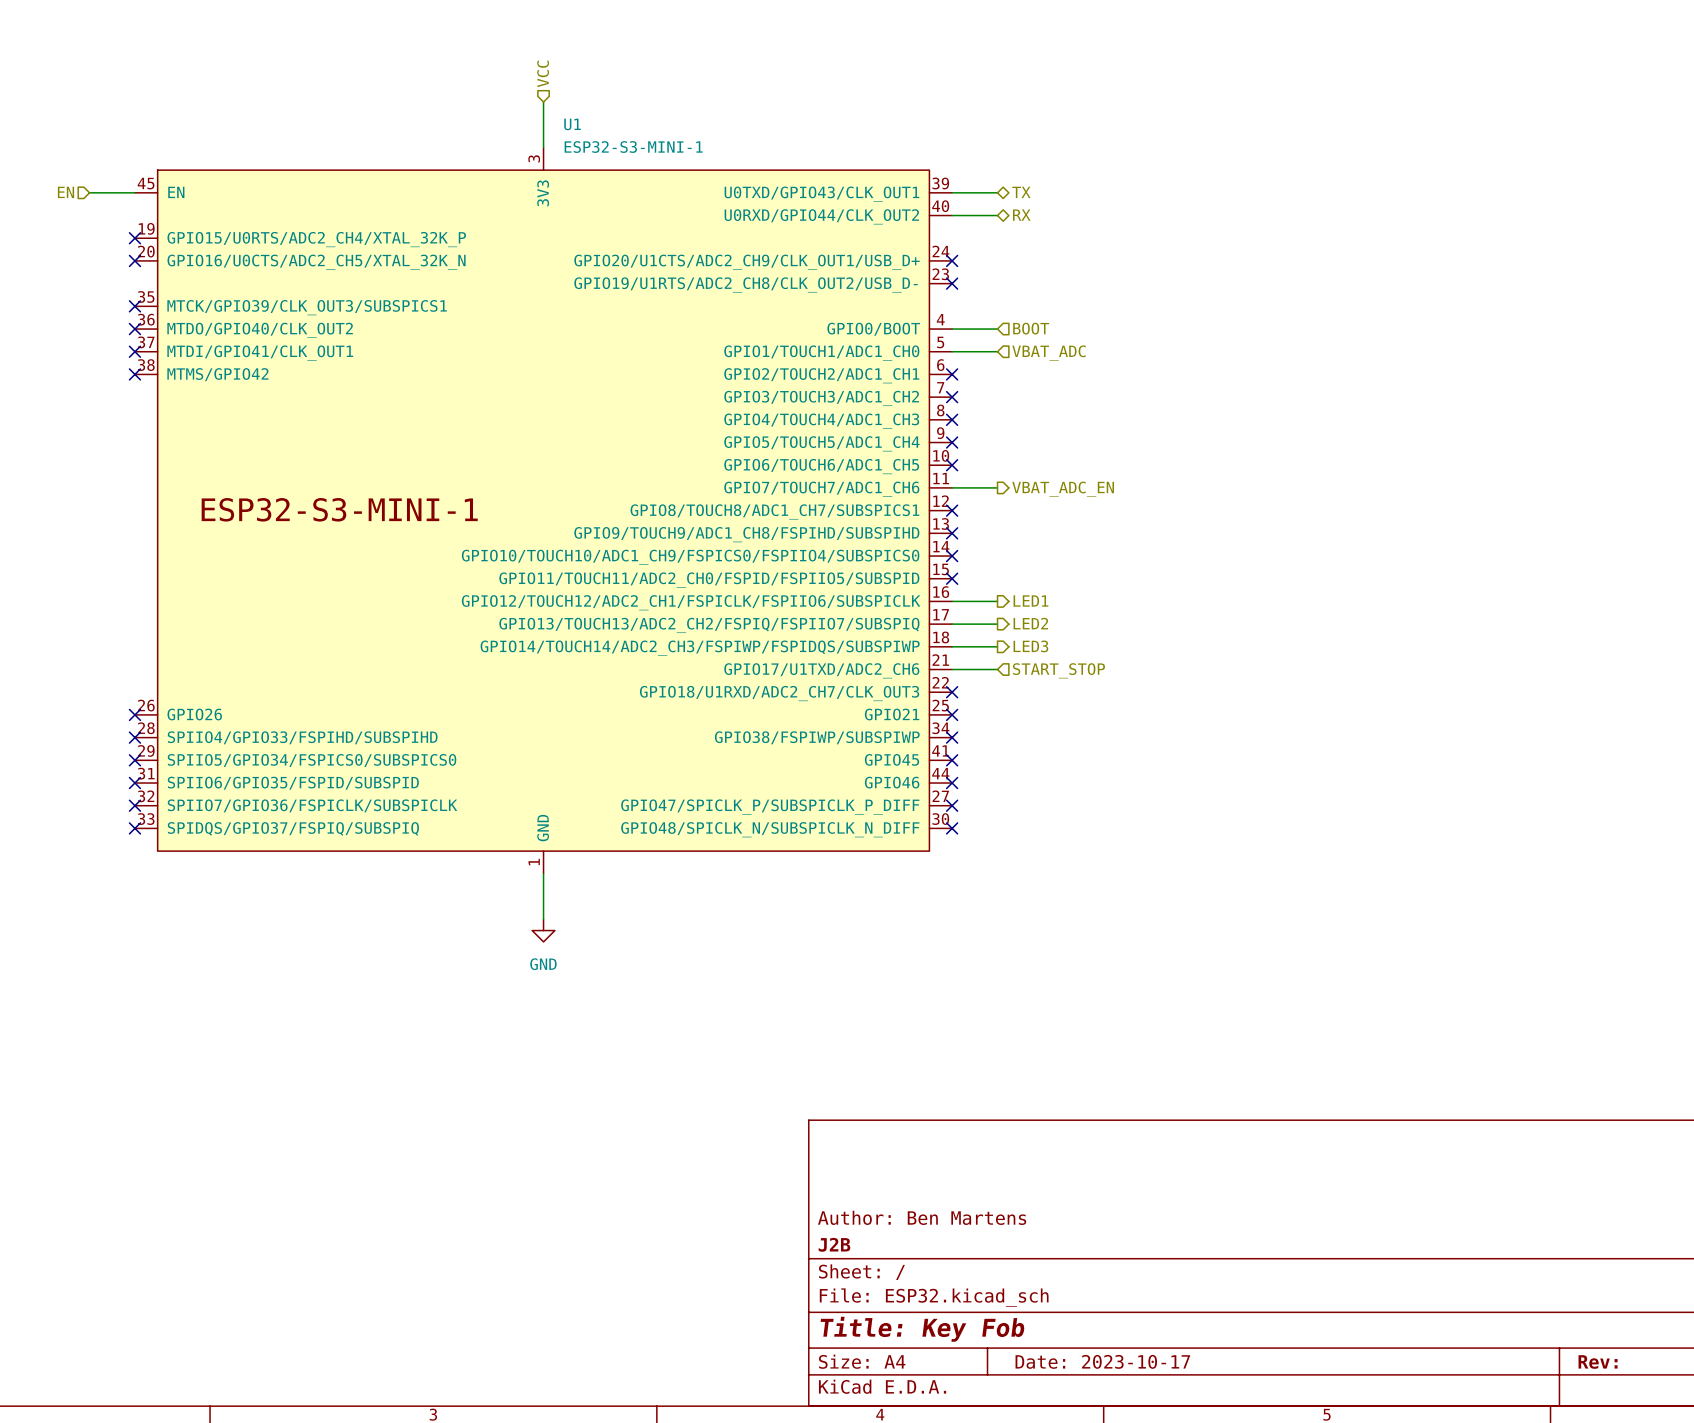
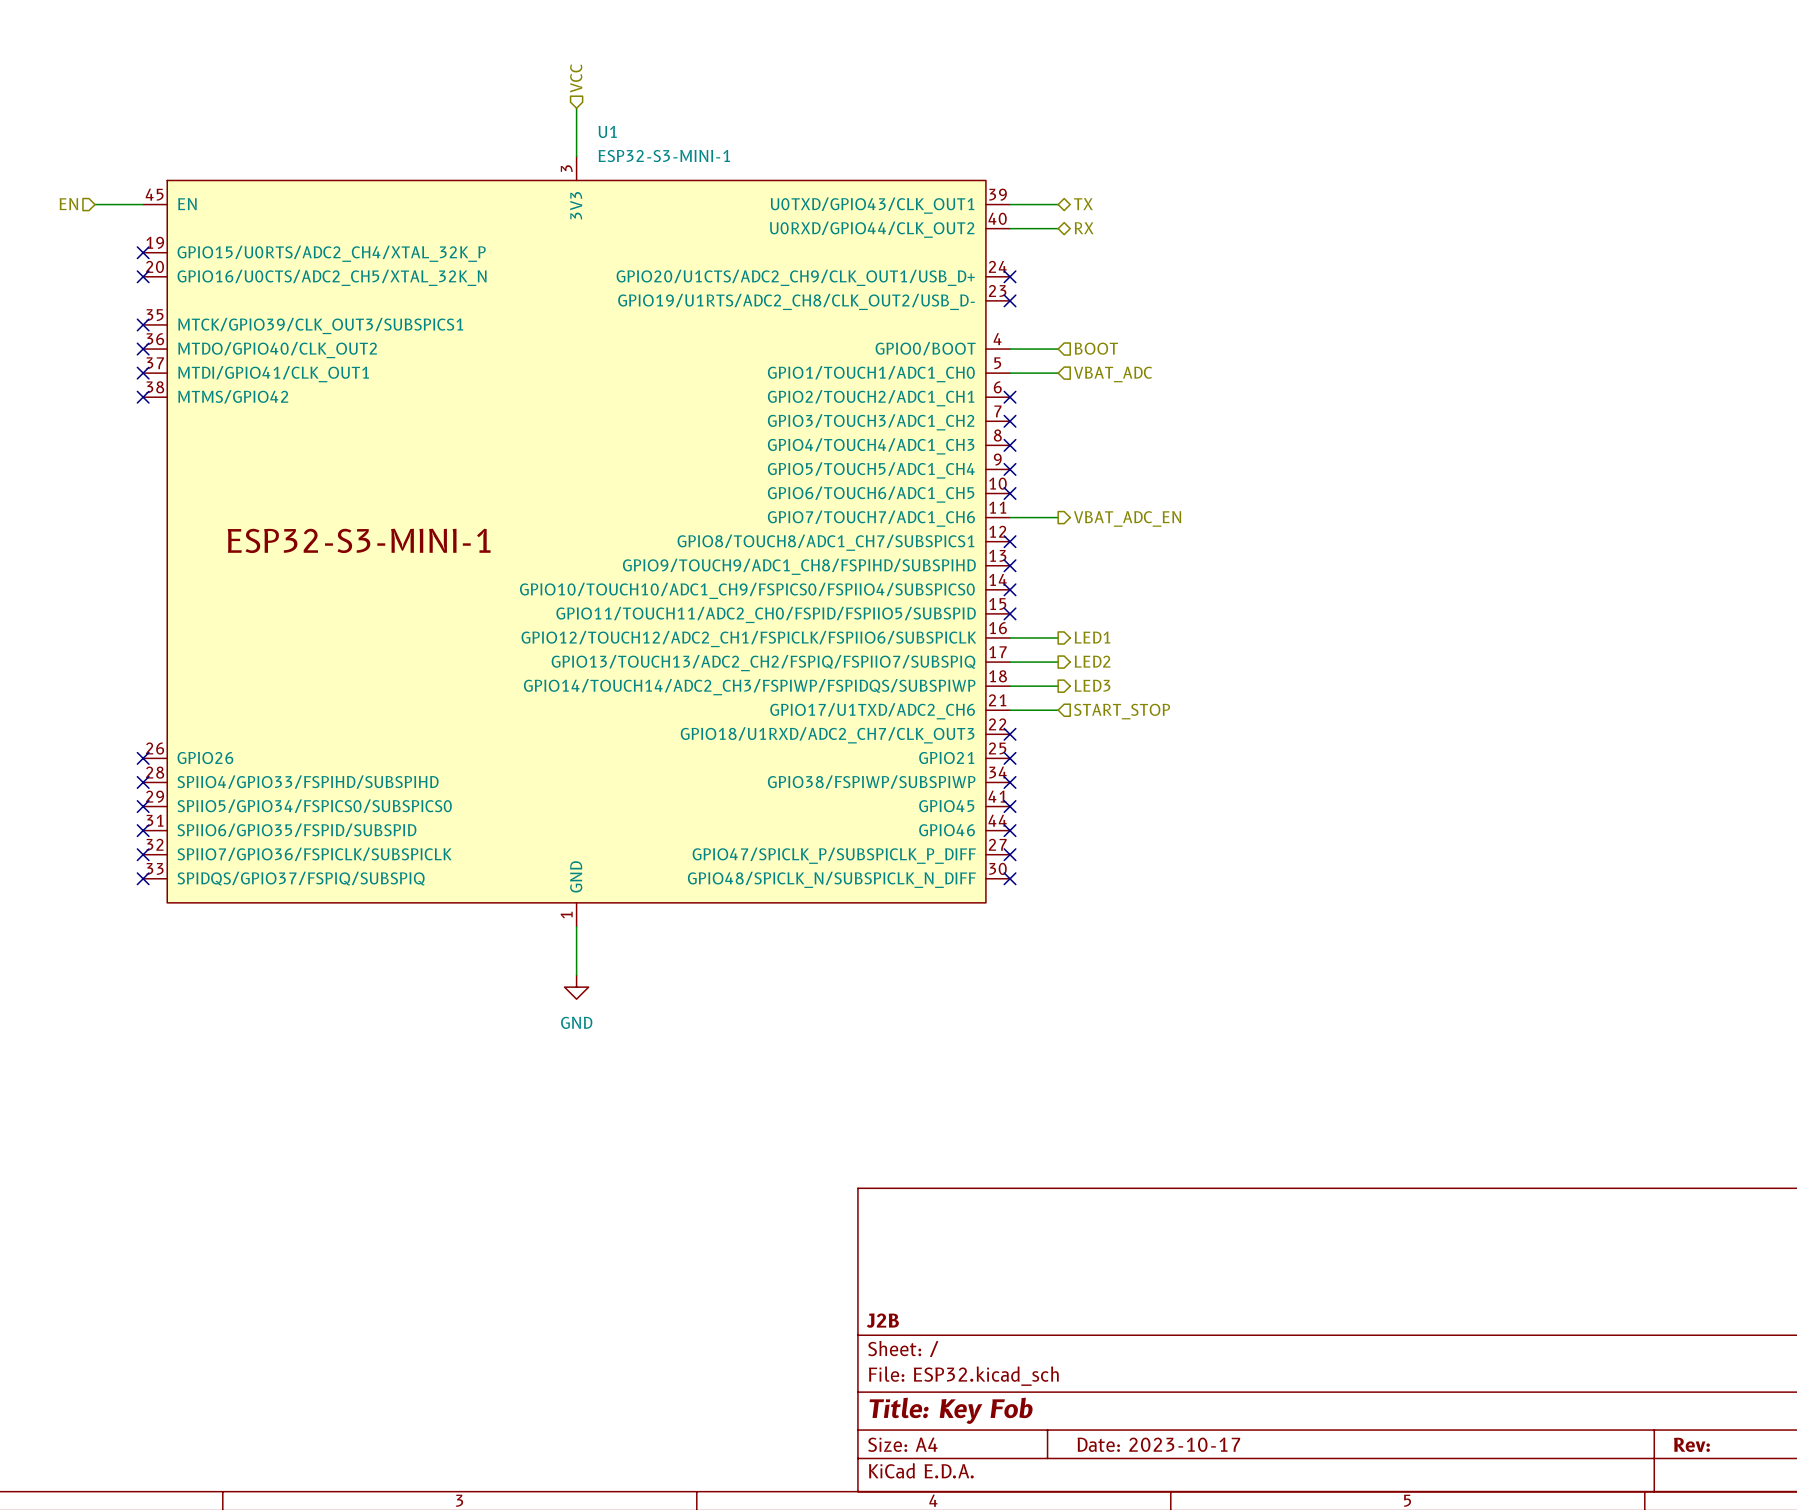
title block: Author: Ben Martens (922, 1217) -> none

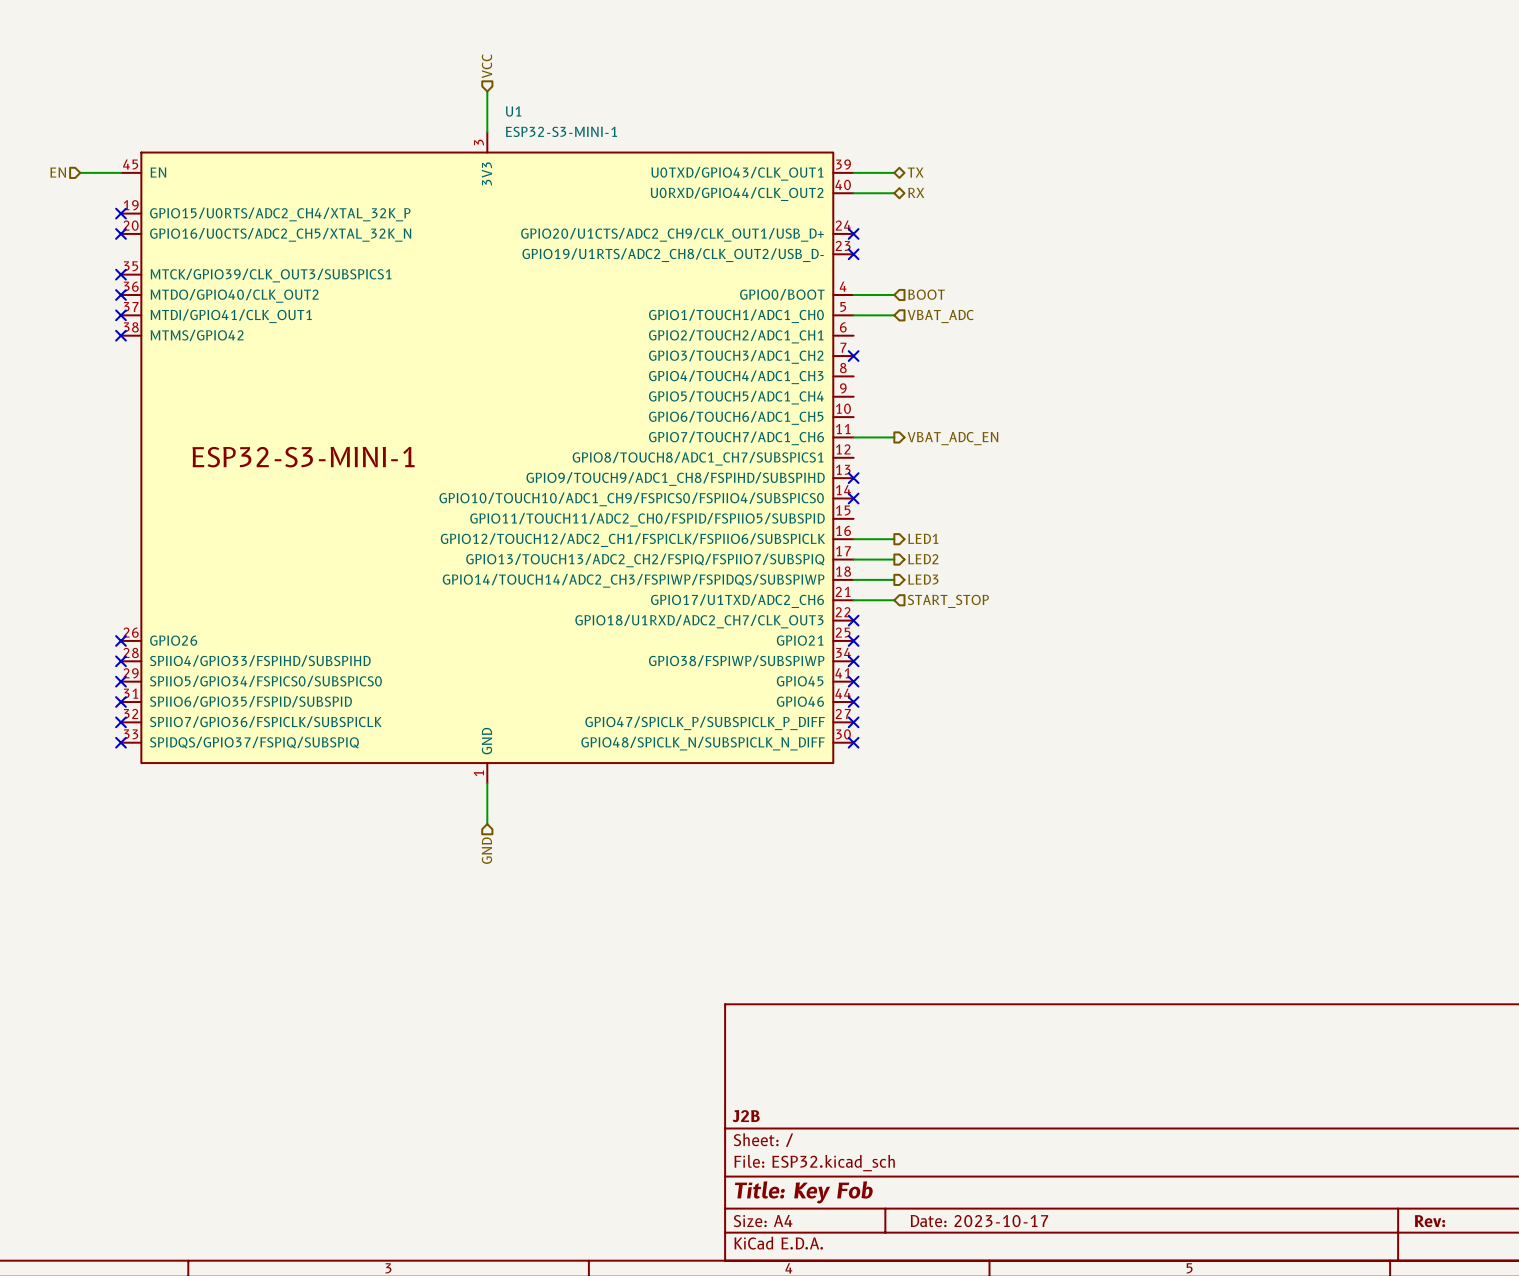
no-connect mark: (1010, 397) -> none
no-connect mark: (1010, 445) -> none
no-connect mark: (1010, 469) -> none
no-connect mark: (1010, 493) -> none
no-connect mark: (1010, 541) -> none
no-connect mark: (1010, 613) -> none
power symbol: GND (576, 987) -> none
hierarchical label: none -> GND (486, 850)

